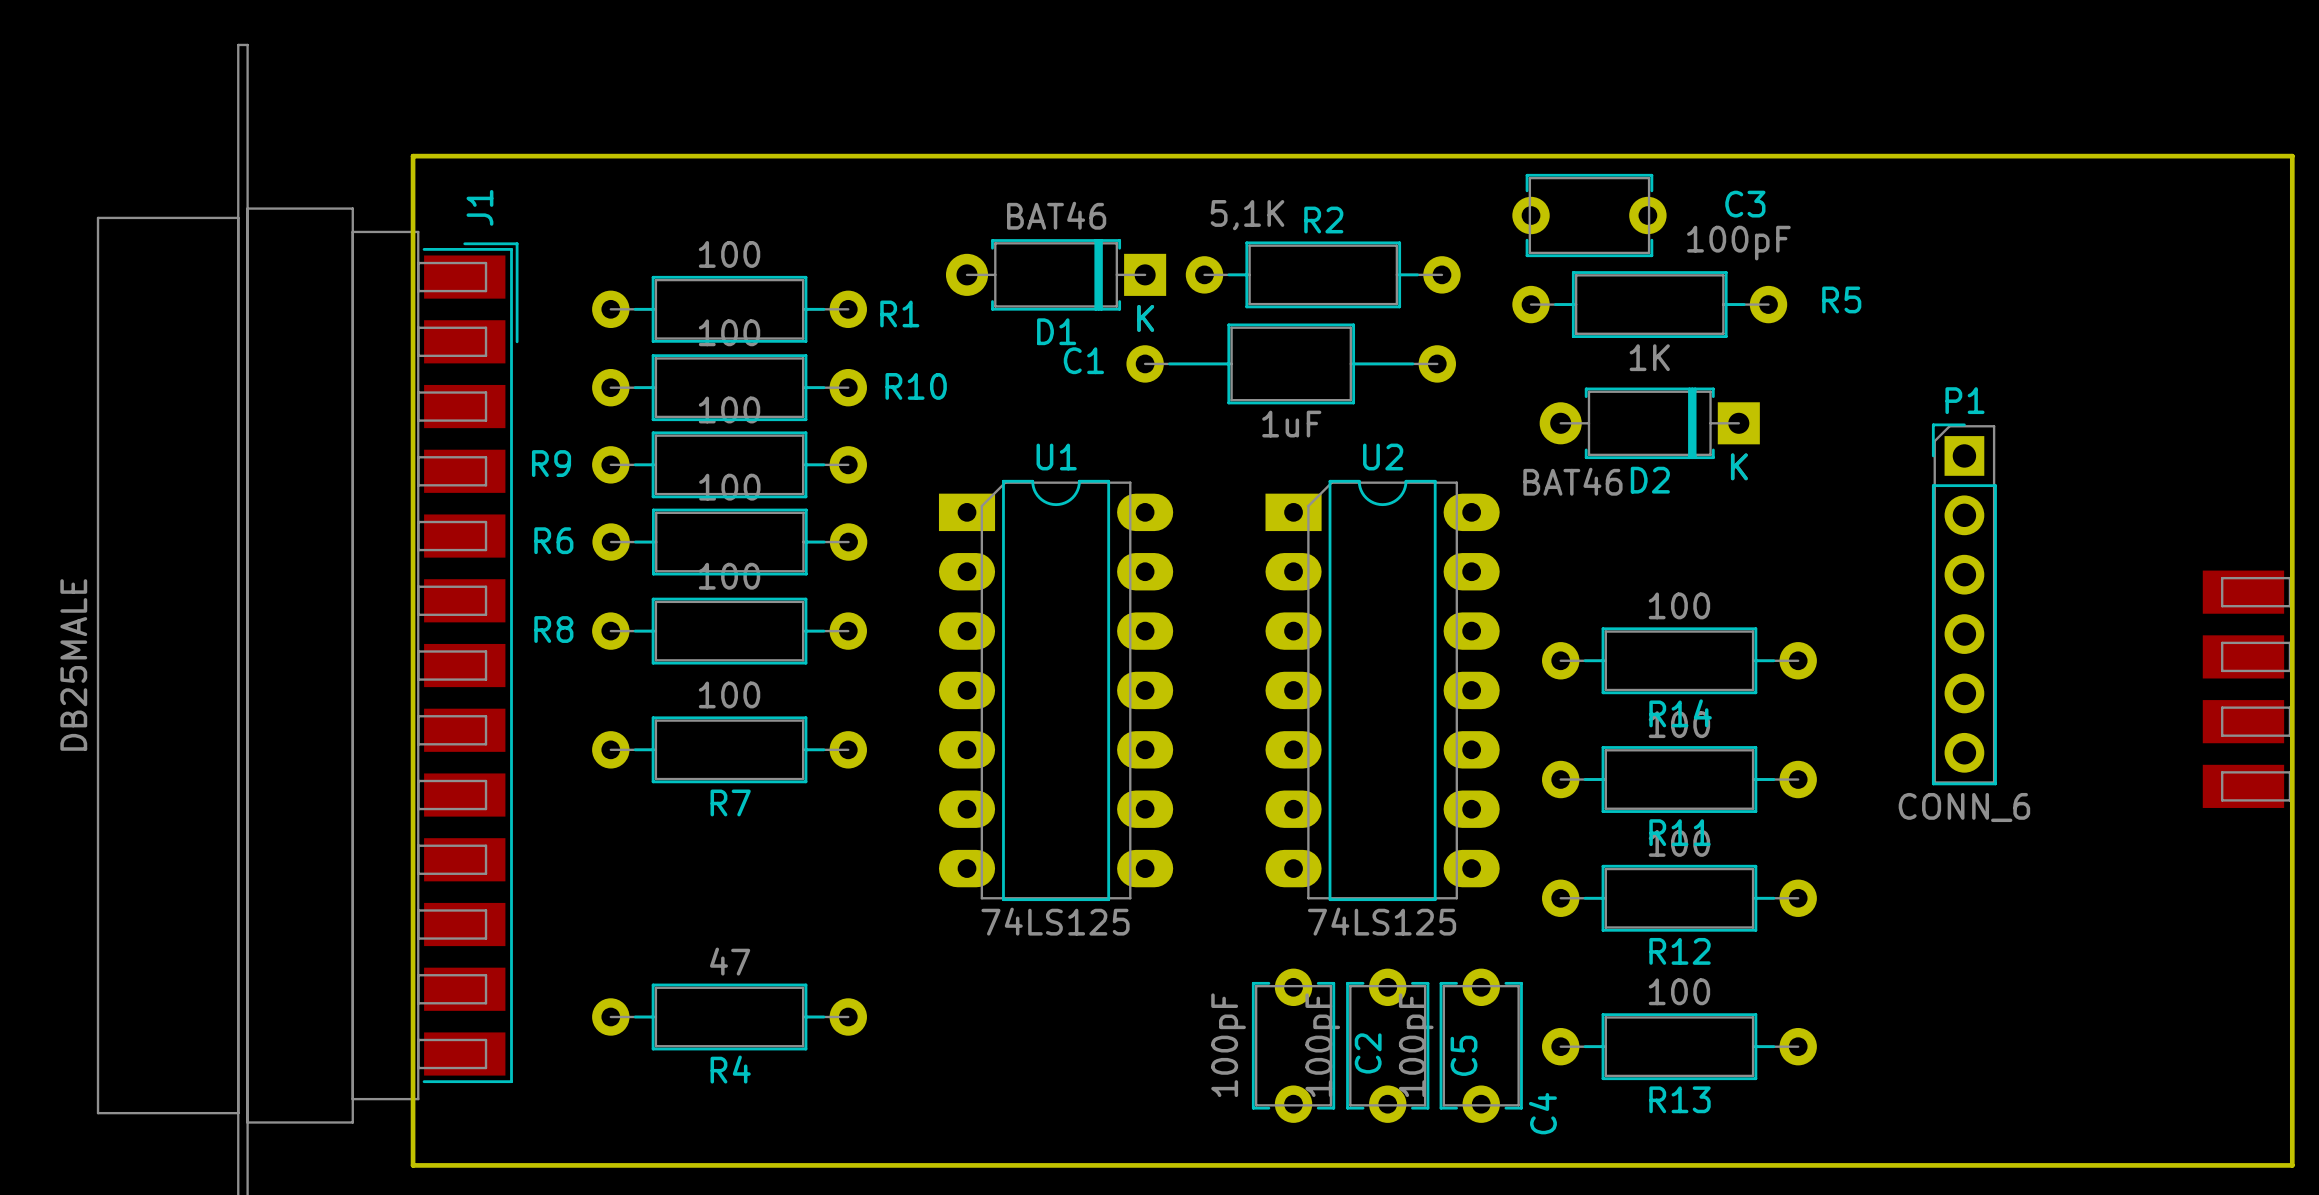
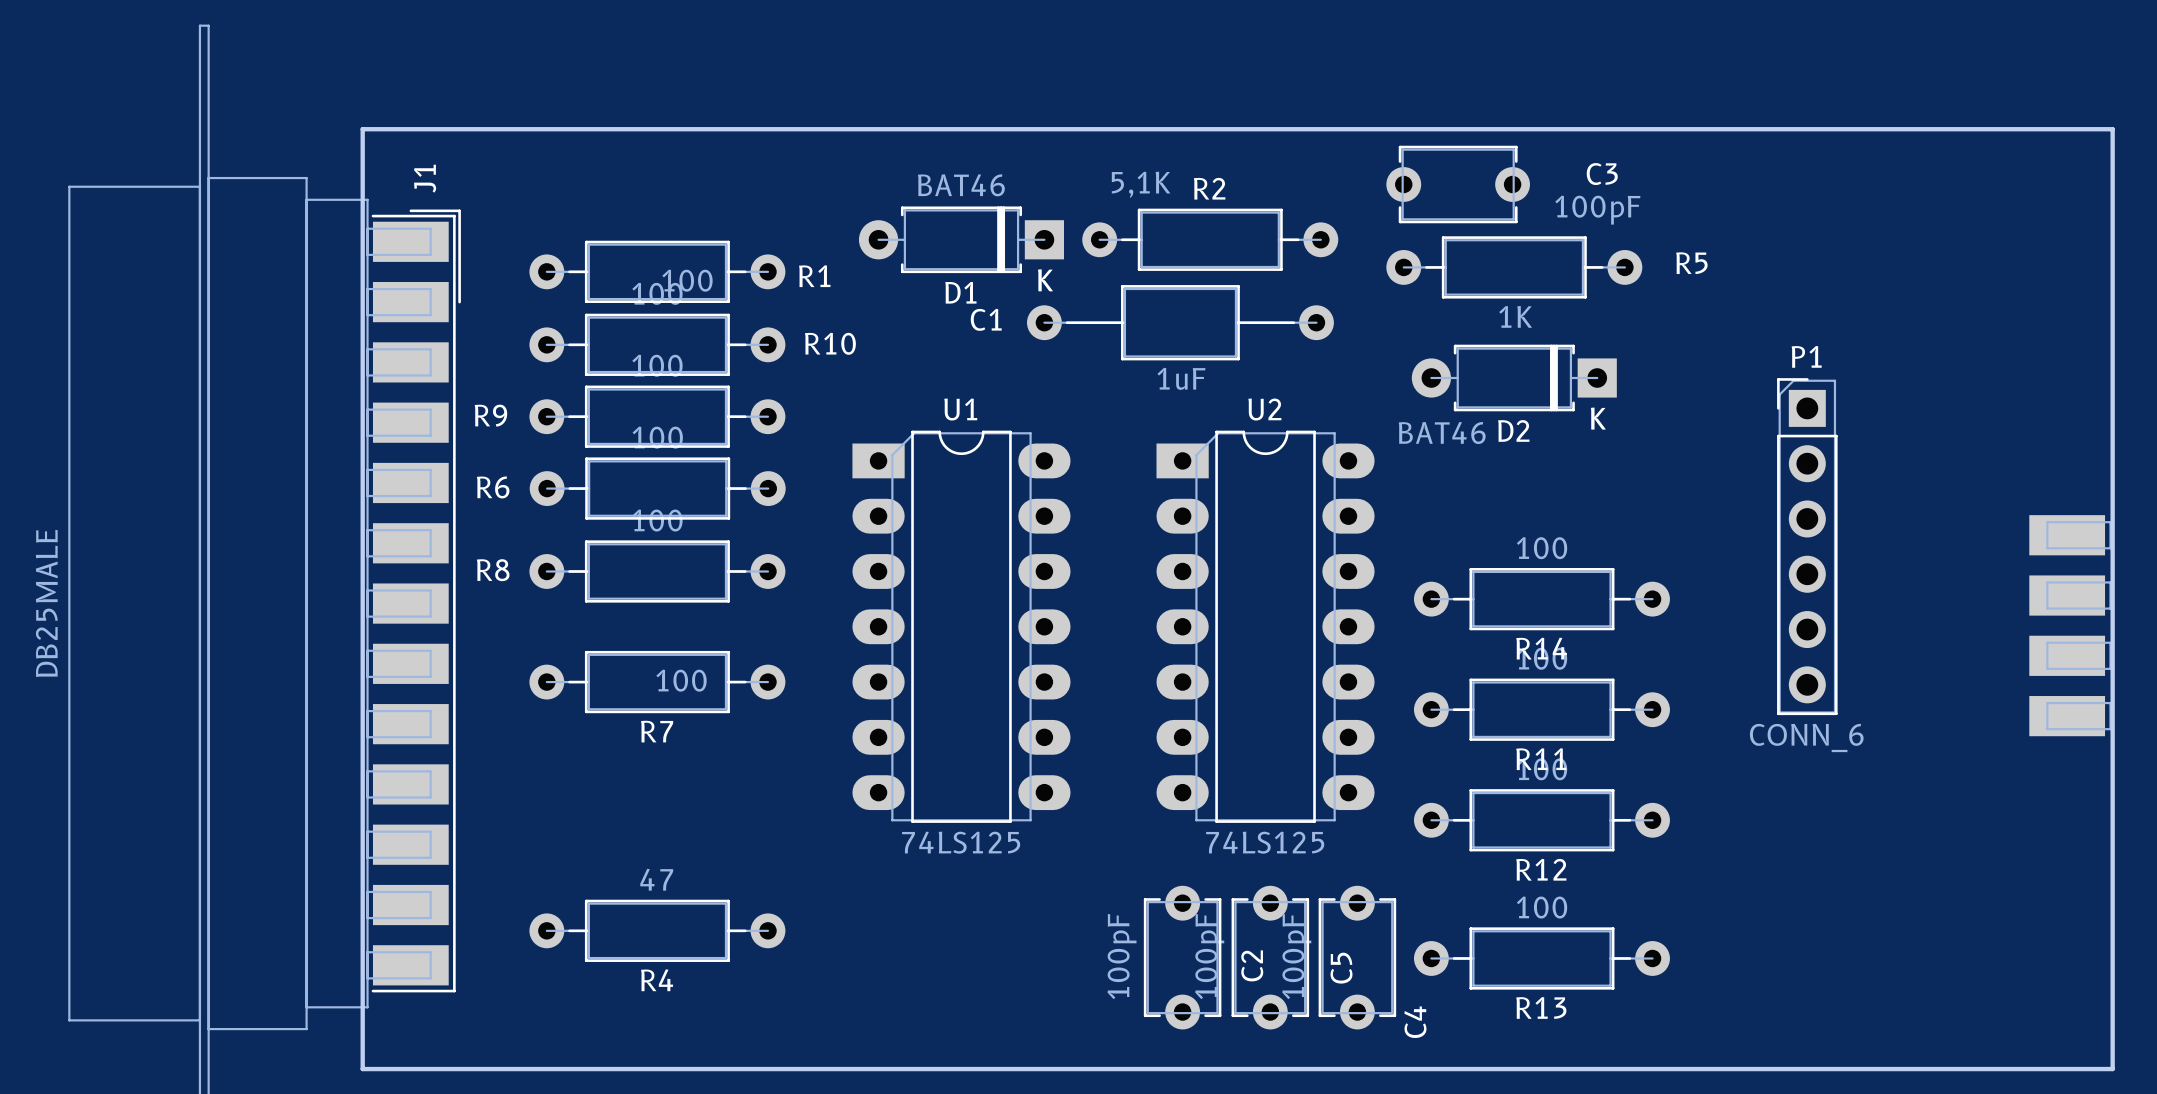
R1 value position: 100 (729, 254) -> 100 (687, 280)
R7 value position: 100 (729, 694) -> 100 (681, 680)

